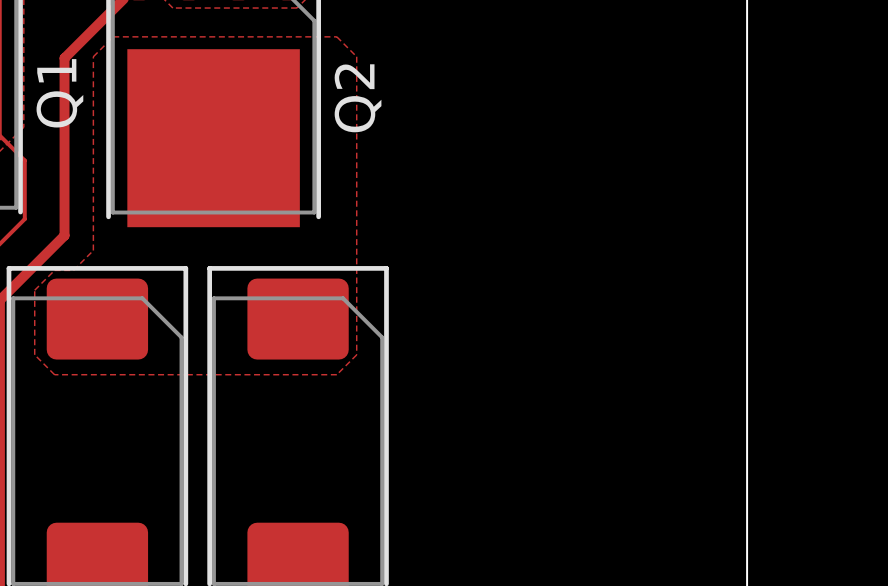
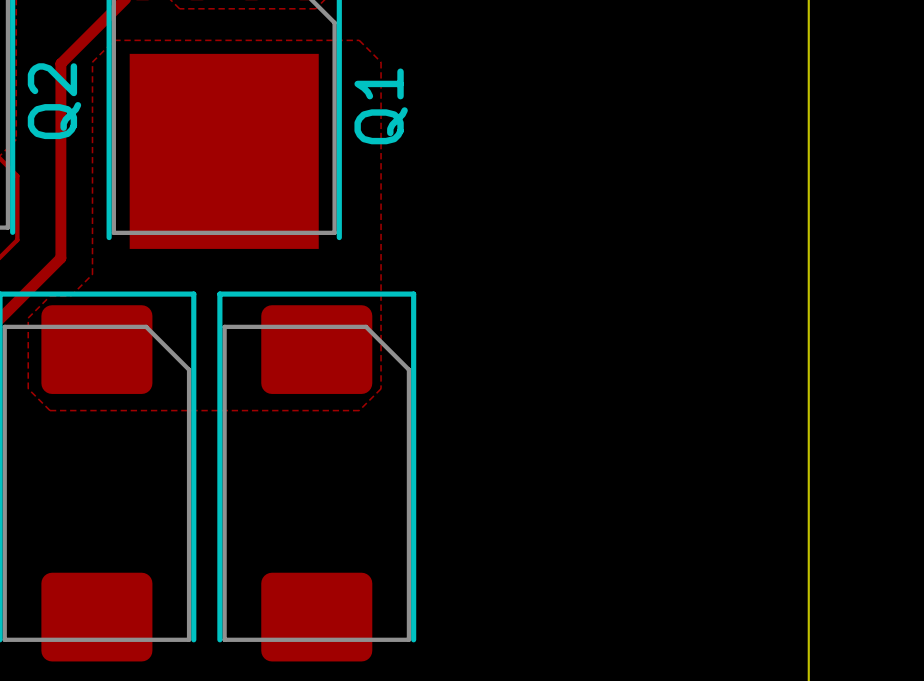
Q1 name: Q1 (59, 93) -> Q2 (54, 101)
Q2 name: Q2 (358, 98) -> Q1 (381, 106)

